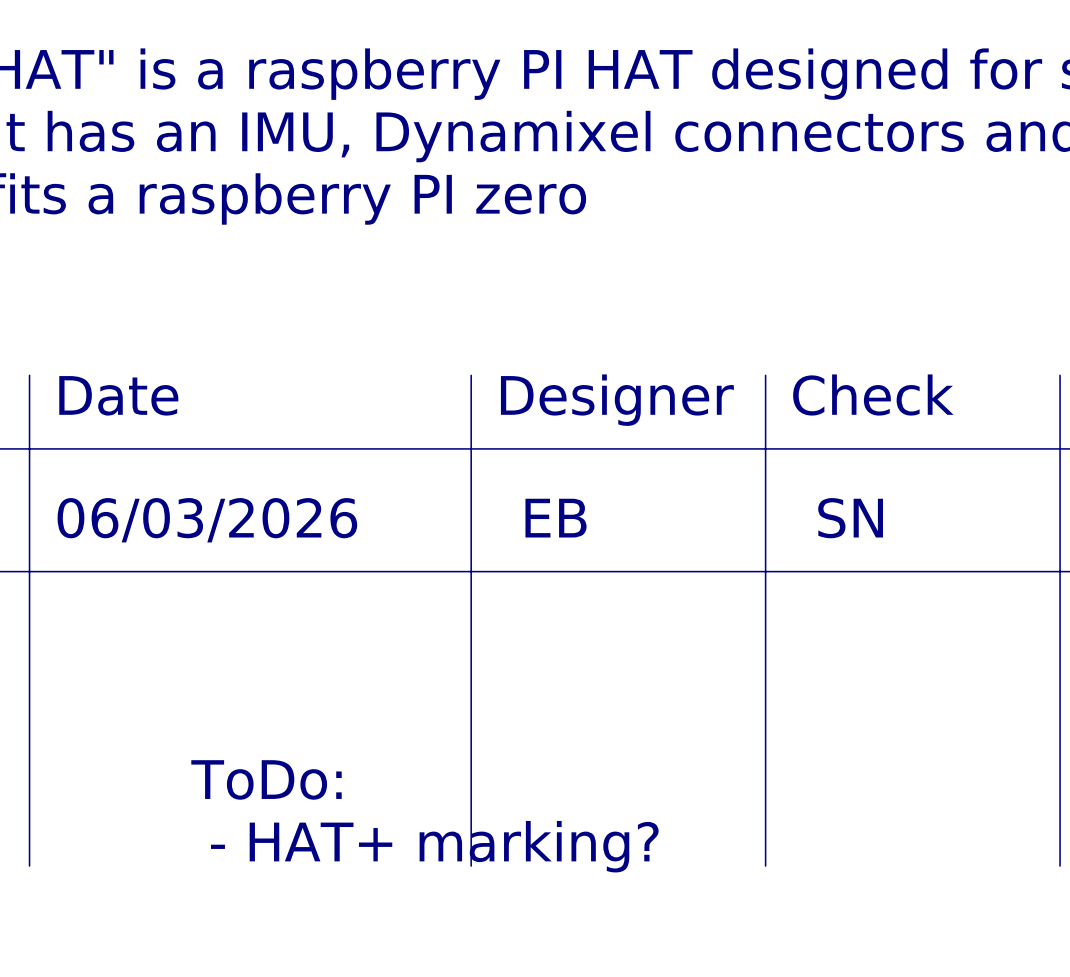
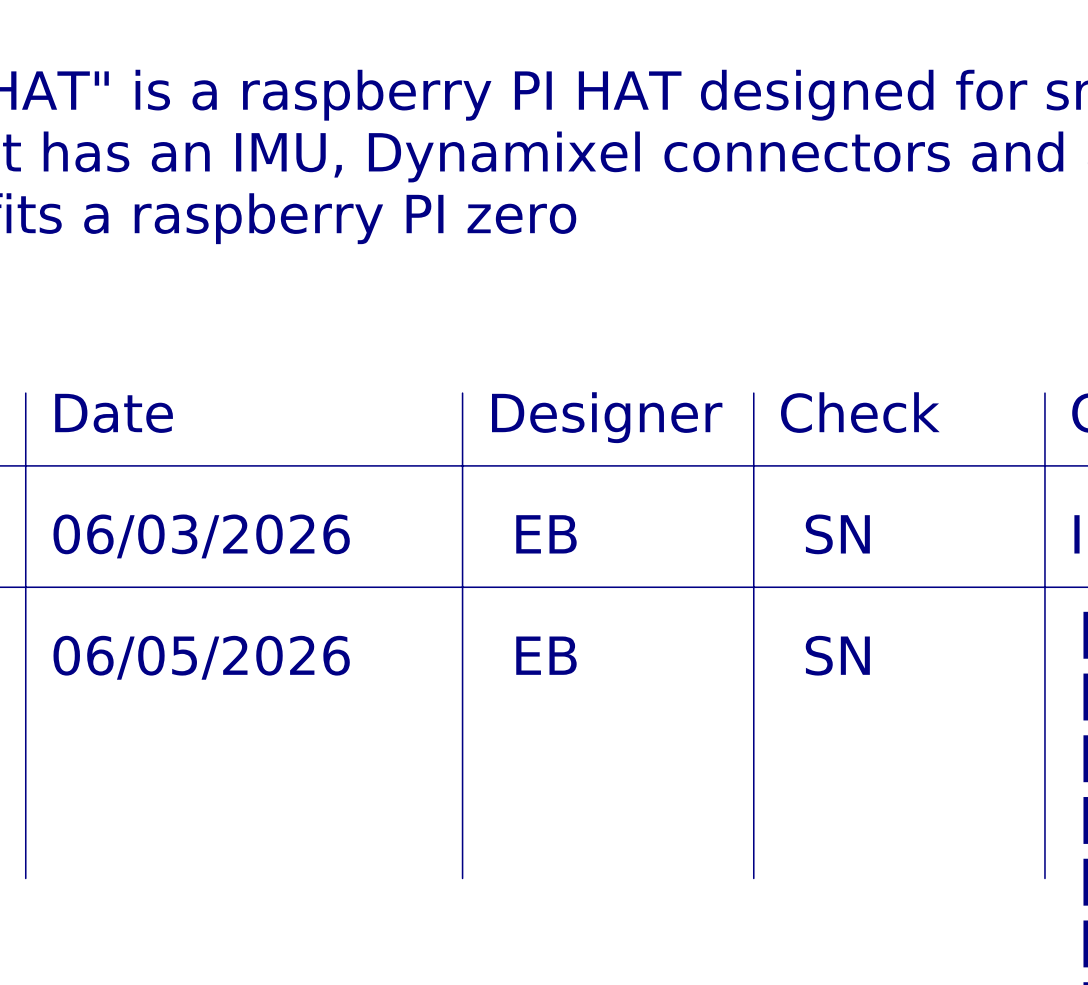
text: none -> EB (546, 655)
text: none -> SN (837, 655)
text: none -> 06/05/2026 (201, 657)
text: ToDo: (266, 779) -> none
text: - HAT+ marking? (434, 846) -> none

